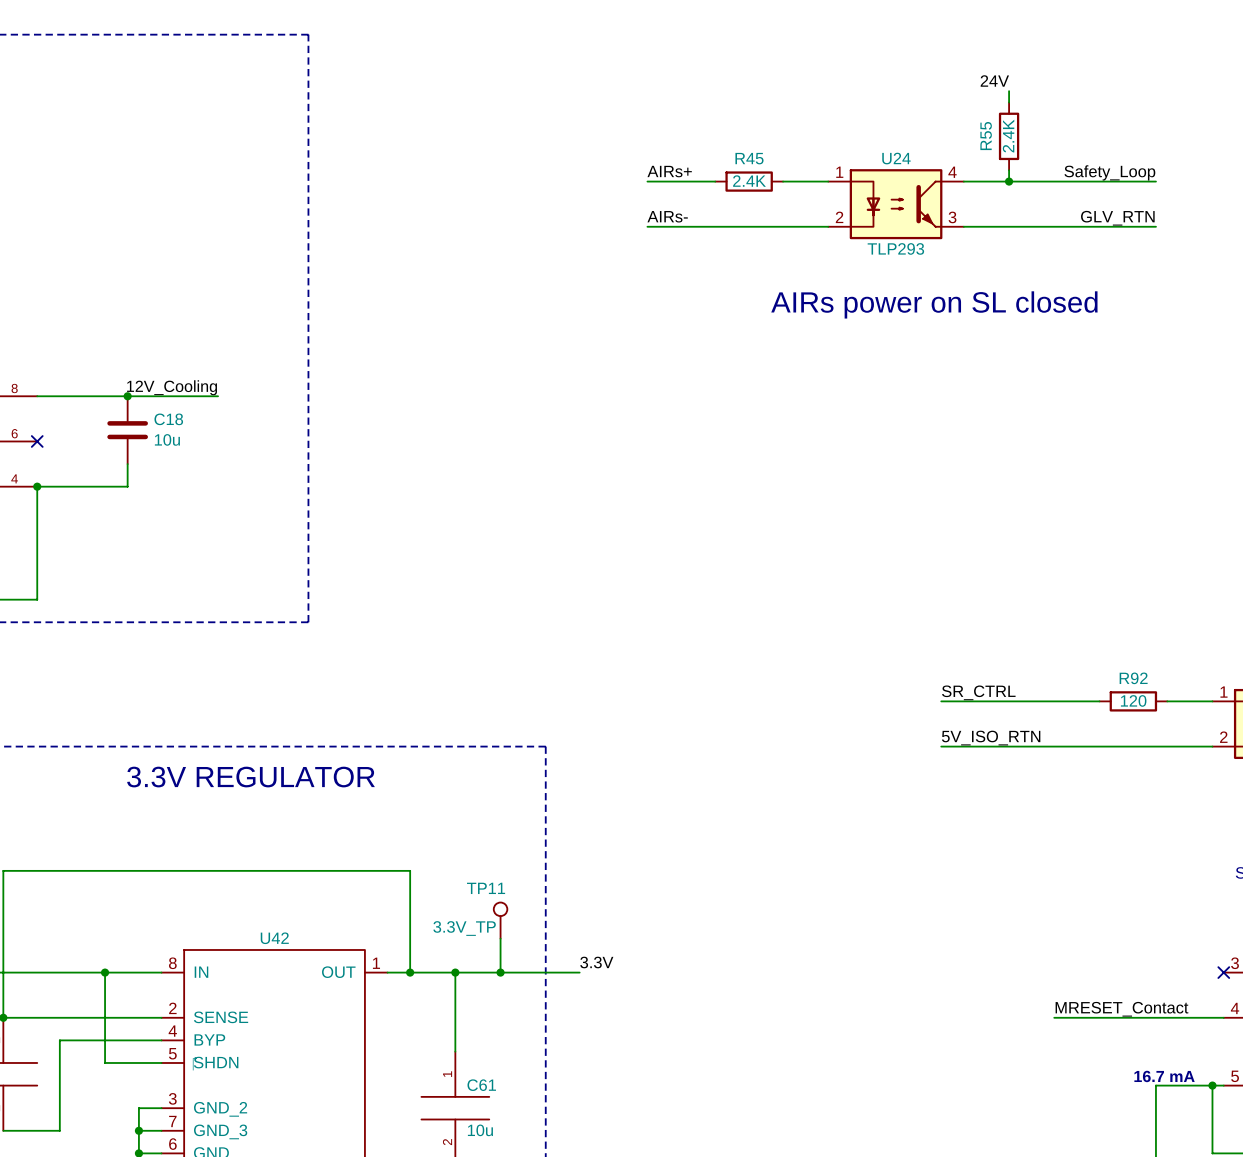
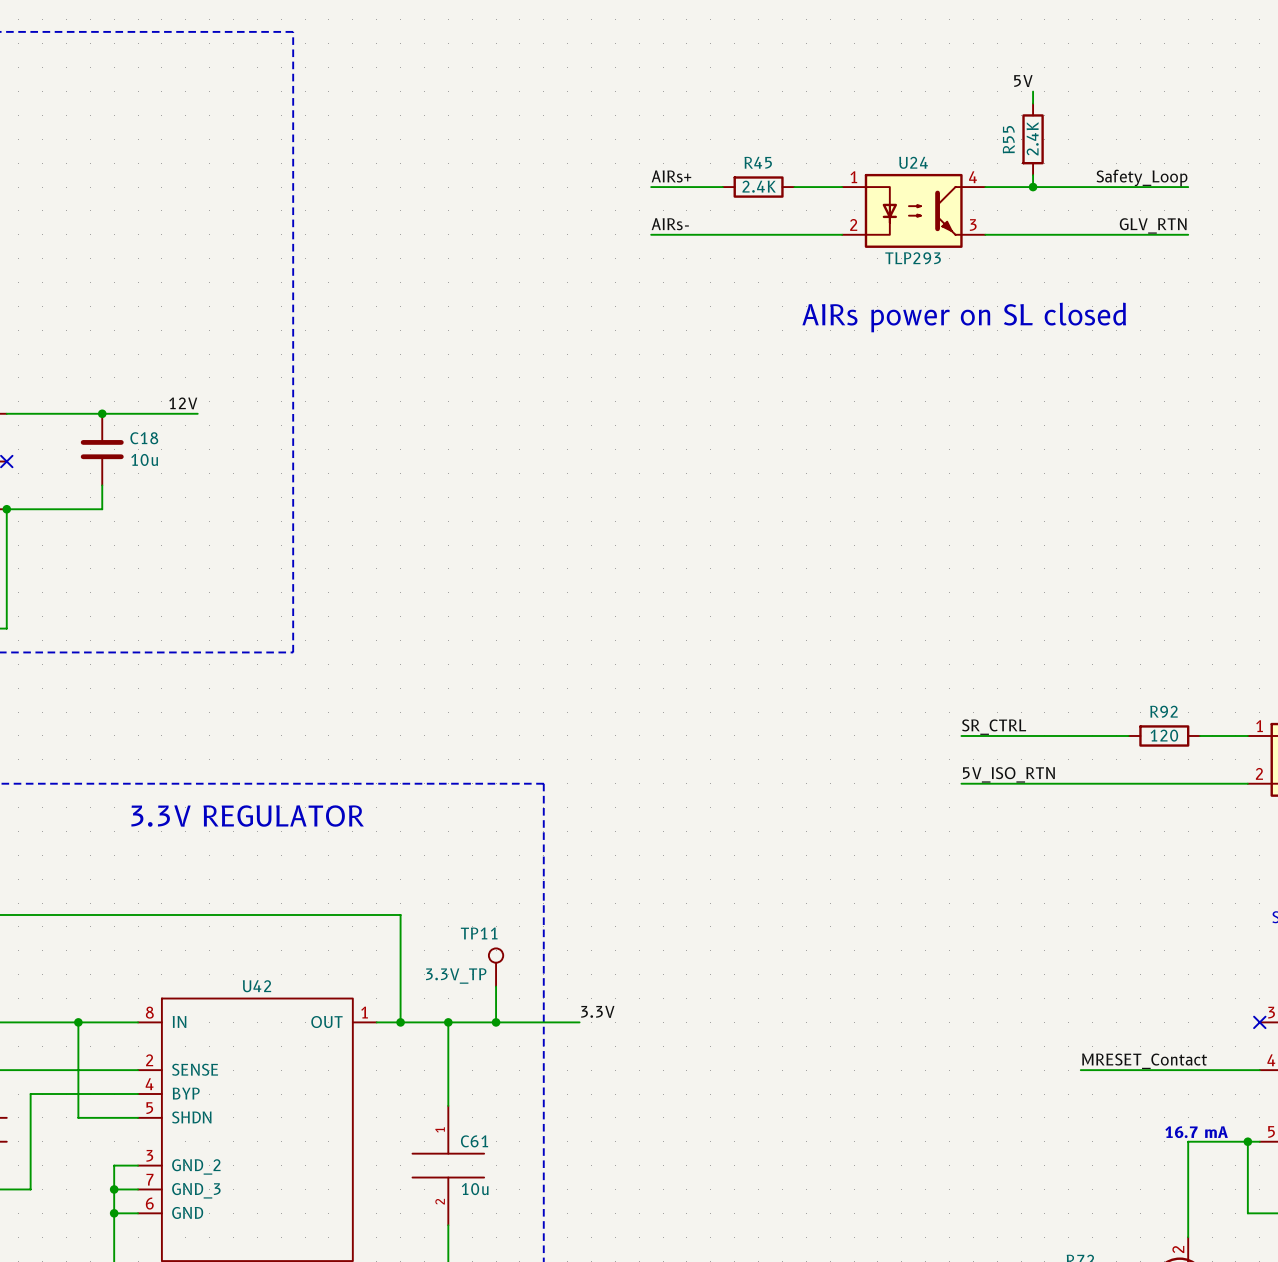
label: 24V (994, 80) -> 5V (1023, 81)
label: 12V_Cooling (172, 387) -> 12V (183, 403)

